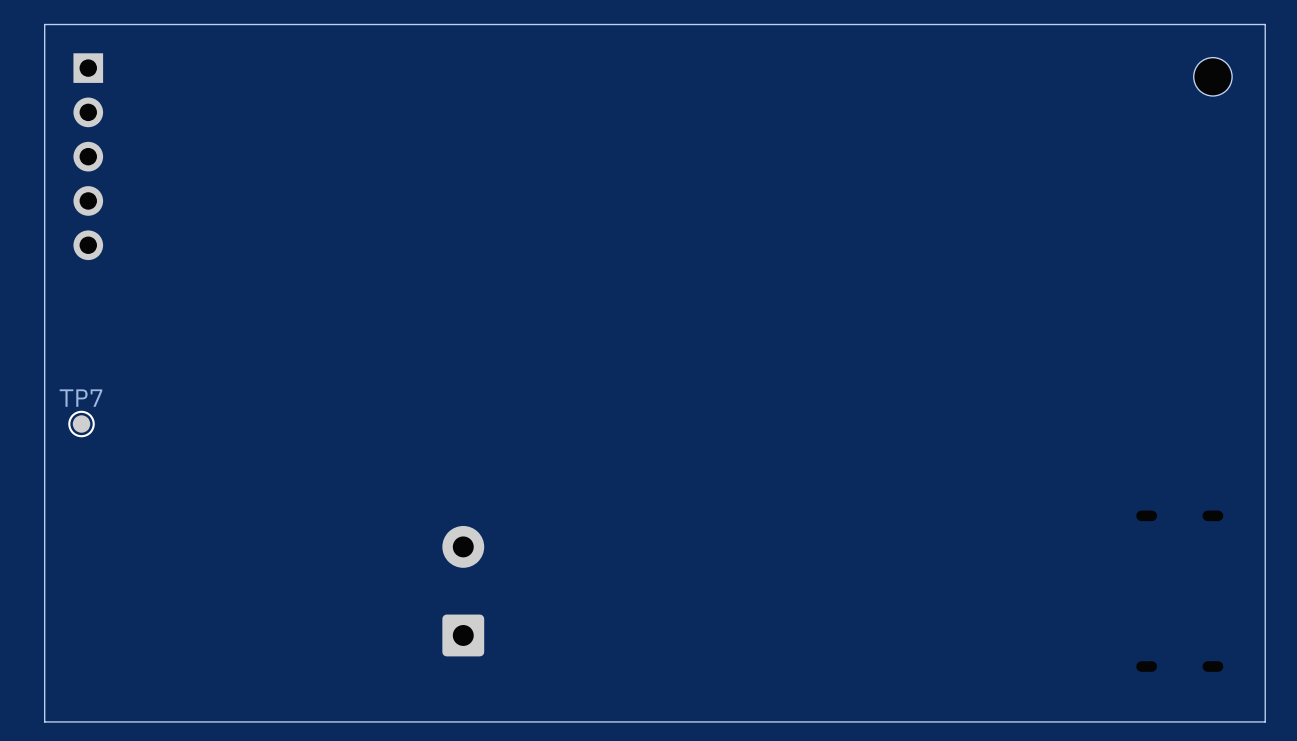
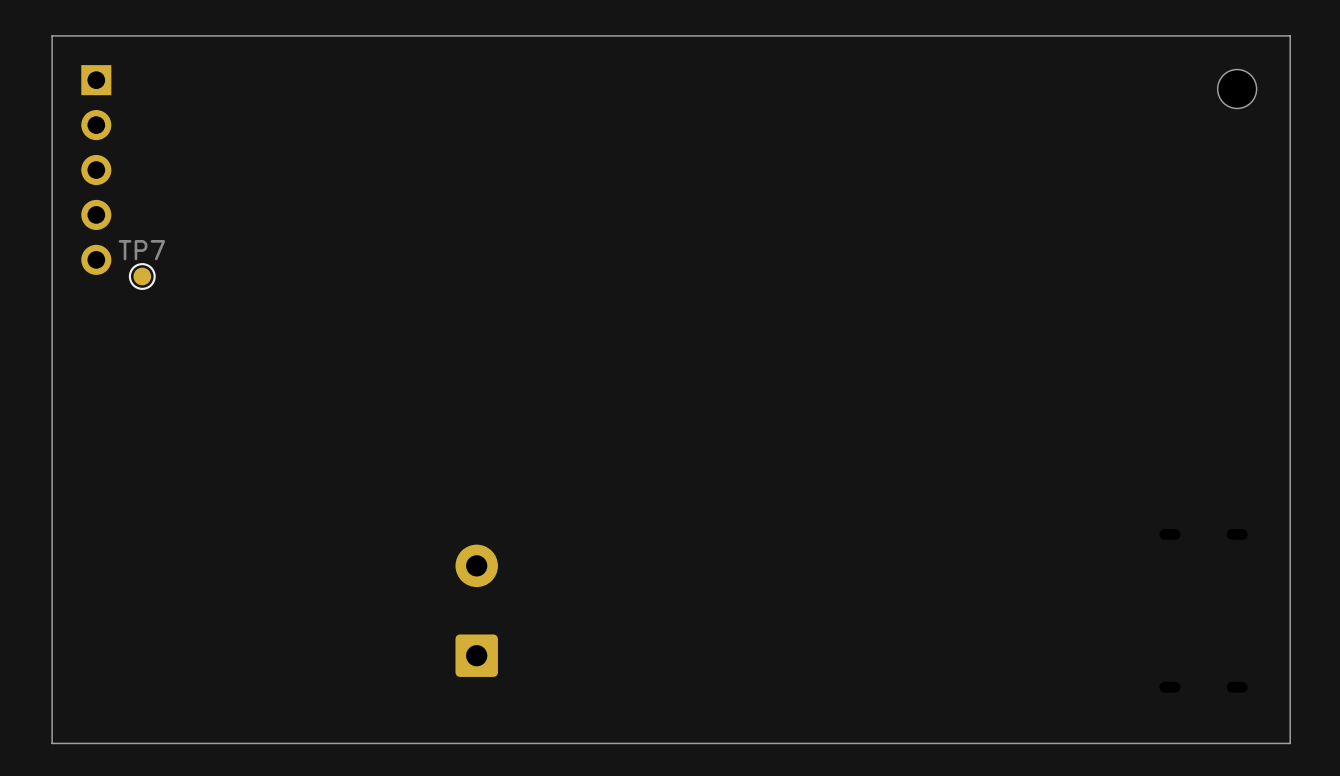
TP7 position: (81, 424) -> (142, 276)

